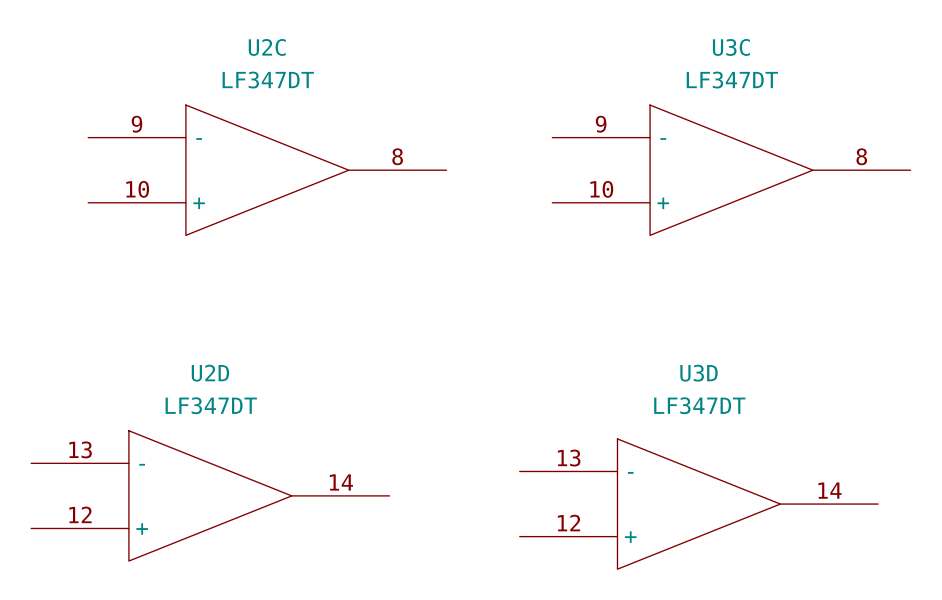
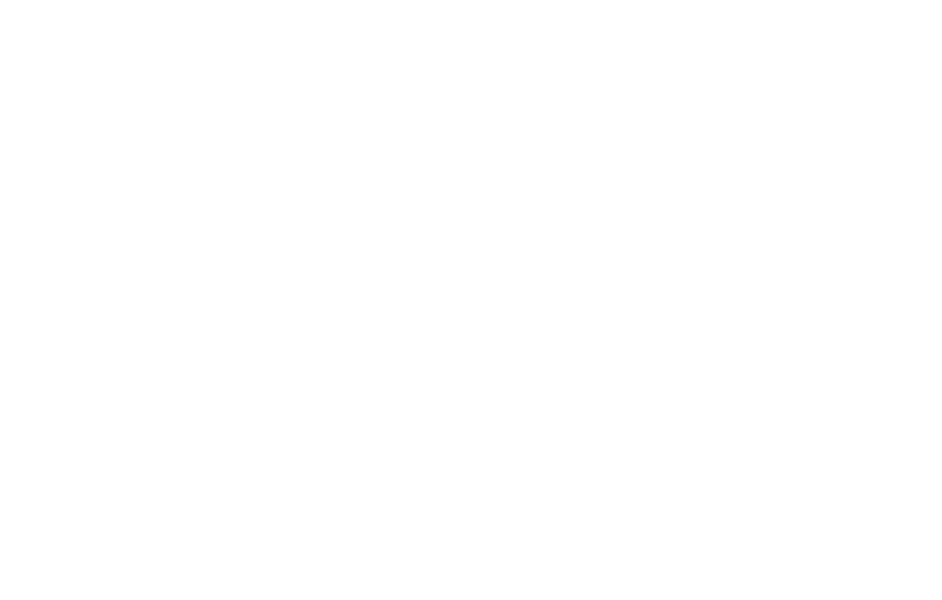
U2C: LF347DT (267, 170) -> none
U3C: LF347DT (731, 170) -> none
U2D: LF347DT (210, 495) -> none
U3D: LF347DT (698, 504) -> none

